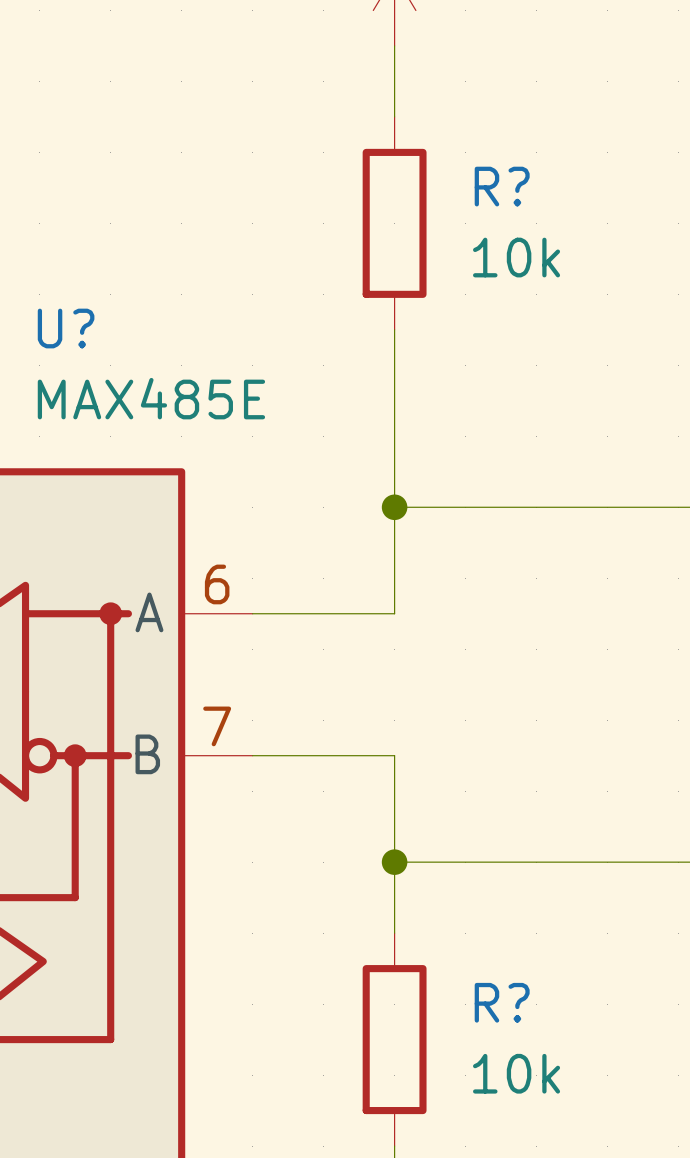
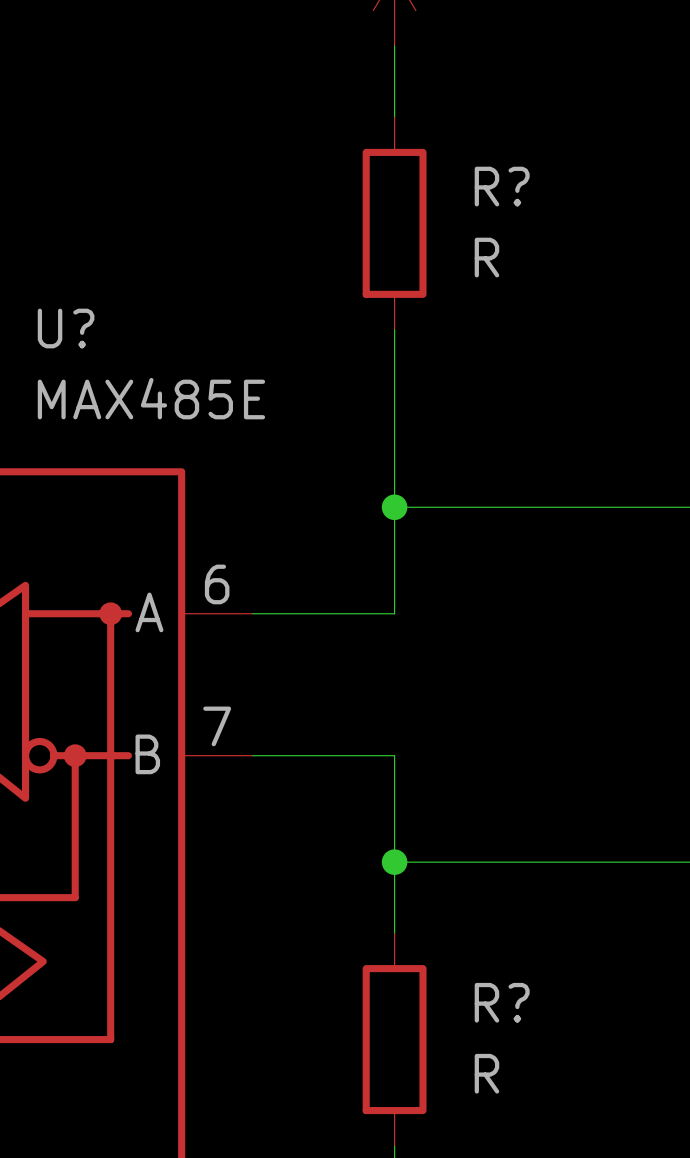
R? value: 10k (516, 257) -> R (486, 257)
R? value: 10k (516, 1073) -> R (486, 1073)

